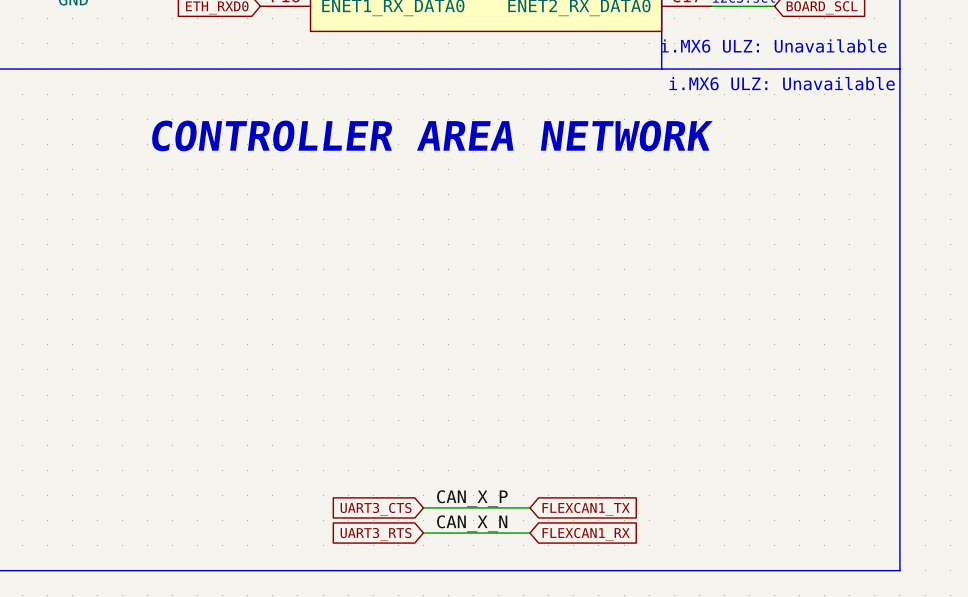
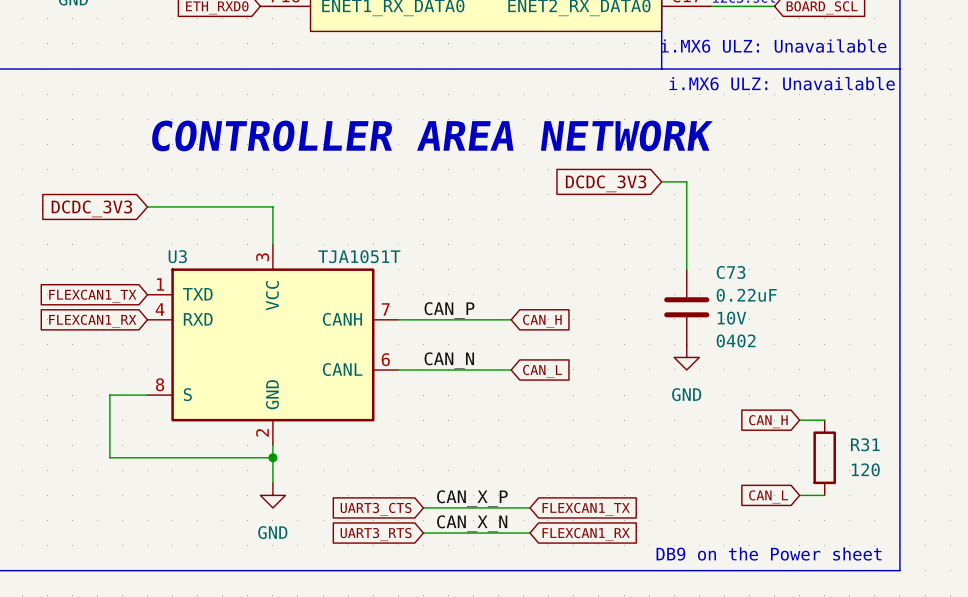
wire: none -> (661, 181) (686, 181) (686, 269)
global label: none -> DCDC_3V3 (606, 183)
wire: none -> (147, 206) (272, 206) (272, 244)
global label: none -> DCDC_3V3 (91, 208)
global label: none -> FLEXCAN1_TX (92, 296)
C73: none -> 0.22uF (686, 307)
label: none -> CAN_P (449, 310)
wire: none -> (398, 319) (511, 319)
global label: none -> FLEXCAN1_RX (92, 321)
global label: none -> CAN_H (542, 321)
U3: none -> TJA1051T (272, 344)
power symbol: none -> GND (686, 357)
label: none -> CAN_N (449, 360)
wire: none -> (398, 369) (511, 369)
global label: none -> CAN_L (542, 371)
wire: none -> (147, 395) (109, 395) (109, 457) (272, 457)
wire: none -> (799, 420) (824, 420)
global label: none -> CAN_H (768, 421)
wire: none -> (272, 445) (272, 482)
junction: none -> (272, 457)
R31: none -> 120 (824, 457)
power symbol: none -> GND (272, 495)
wire: none -> (799, 495) (824, 495)
global label: none -> CAN_L (768, 496)
text: none -> DB9 on the Power sheet (769, 553)

